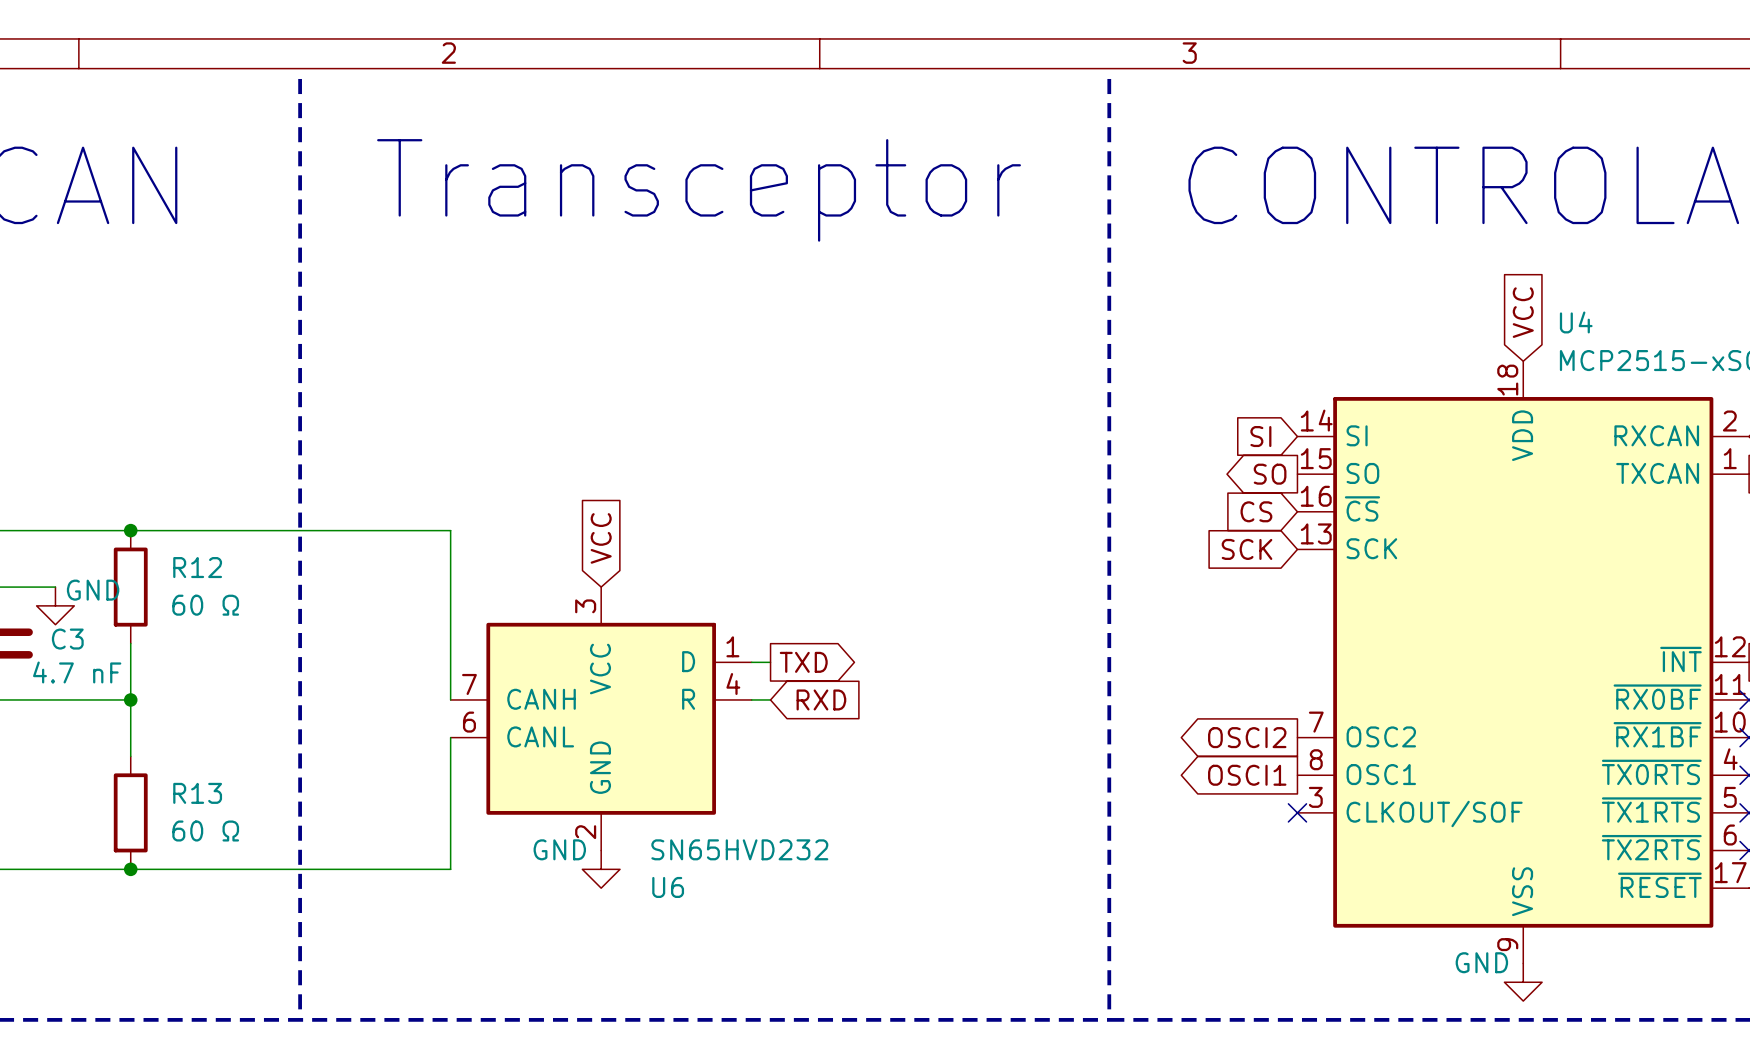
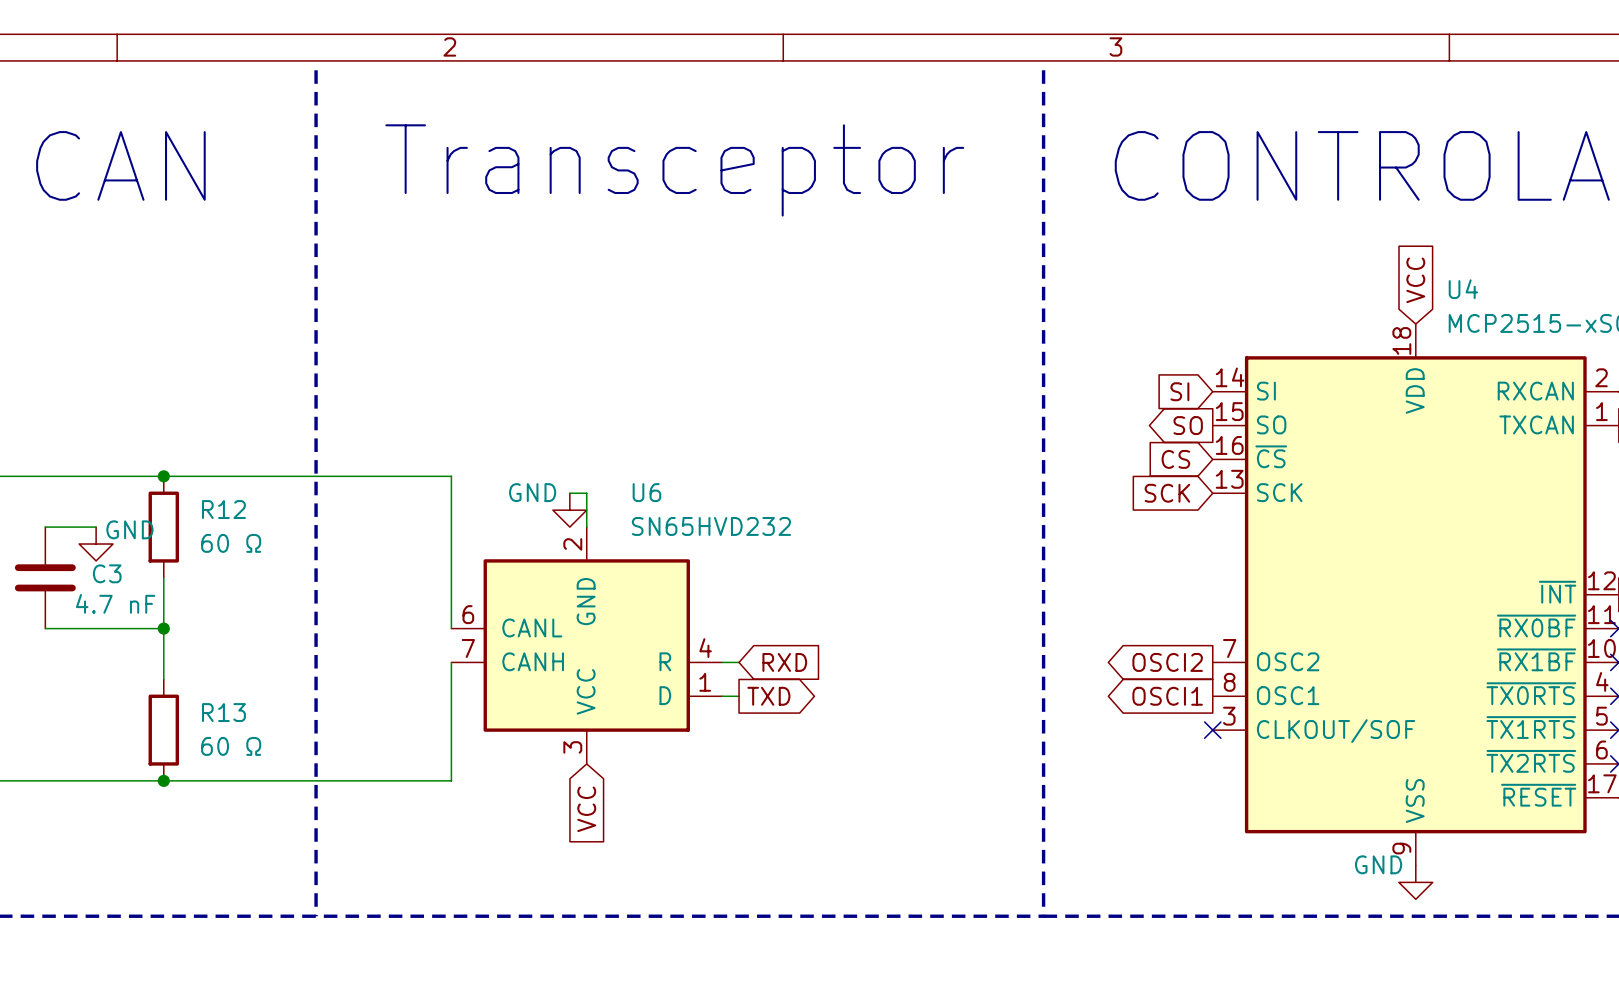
global label rotation: 0° (601, 538) -> 180° (586, 809)
global label position: VCC (601, 538) -> VCC (586, 809)
wire: none -> (569, 493) (586, 493) (586, 527)
wire: (751, 662) (770, 662) -> (722, 696) (739, 696)
global label position: TXD (803, 662) -> TXD (768, 696)
wire: (751, 699) (770, 699) -> (722, 662) (739, 662)
global label position: RXD (821, 699) -> RXD (784, 662)
U6 flip: as is (601, 718) -> up-down (586, 645)
power symbol position: GND (601, 869) -> GND (569, 510)

